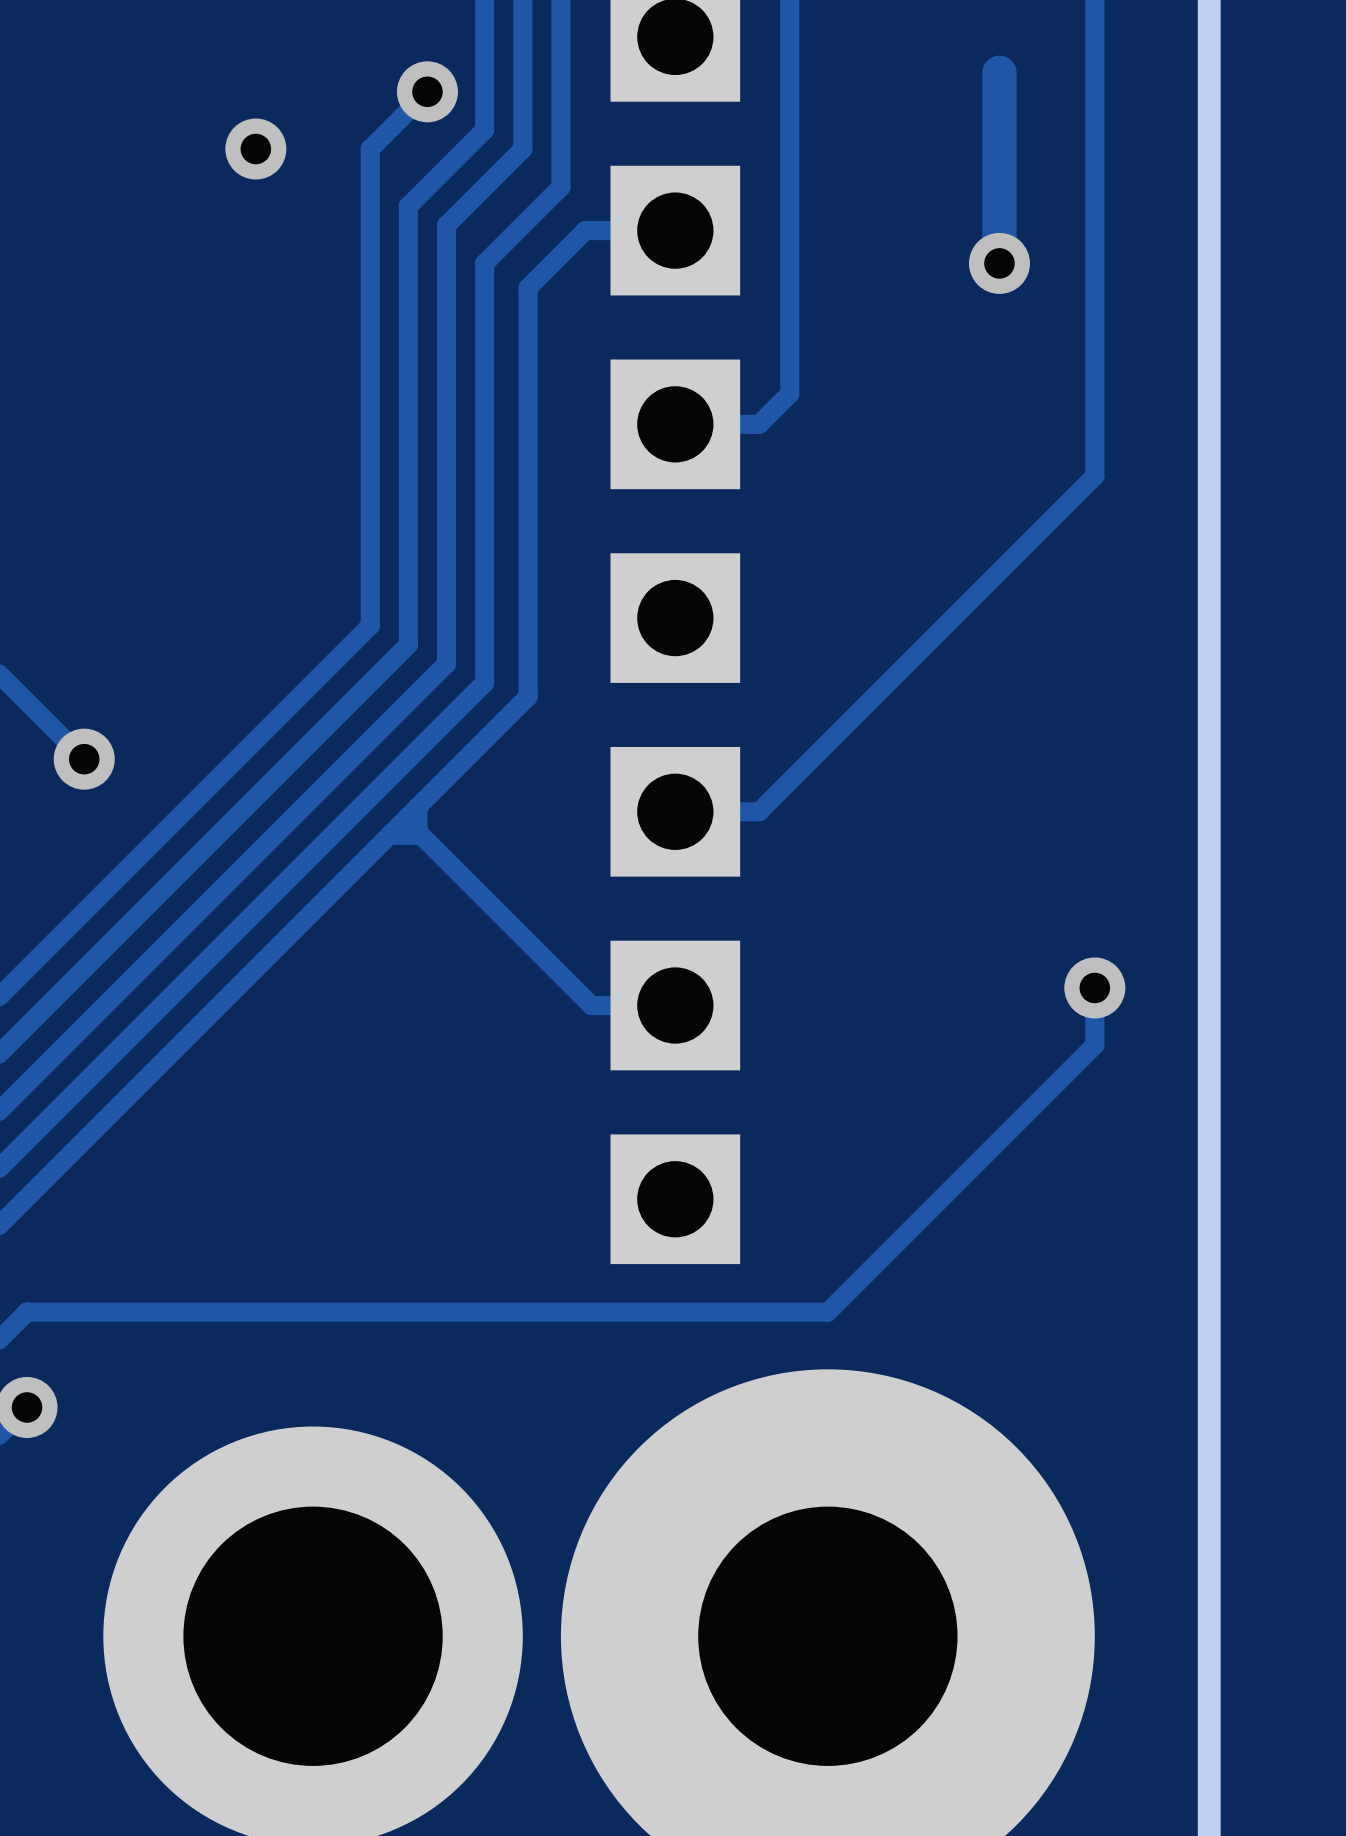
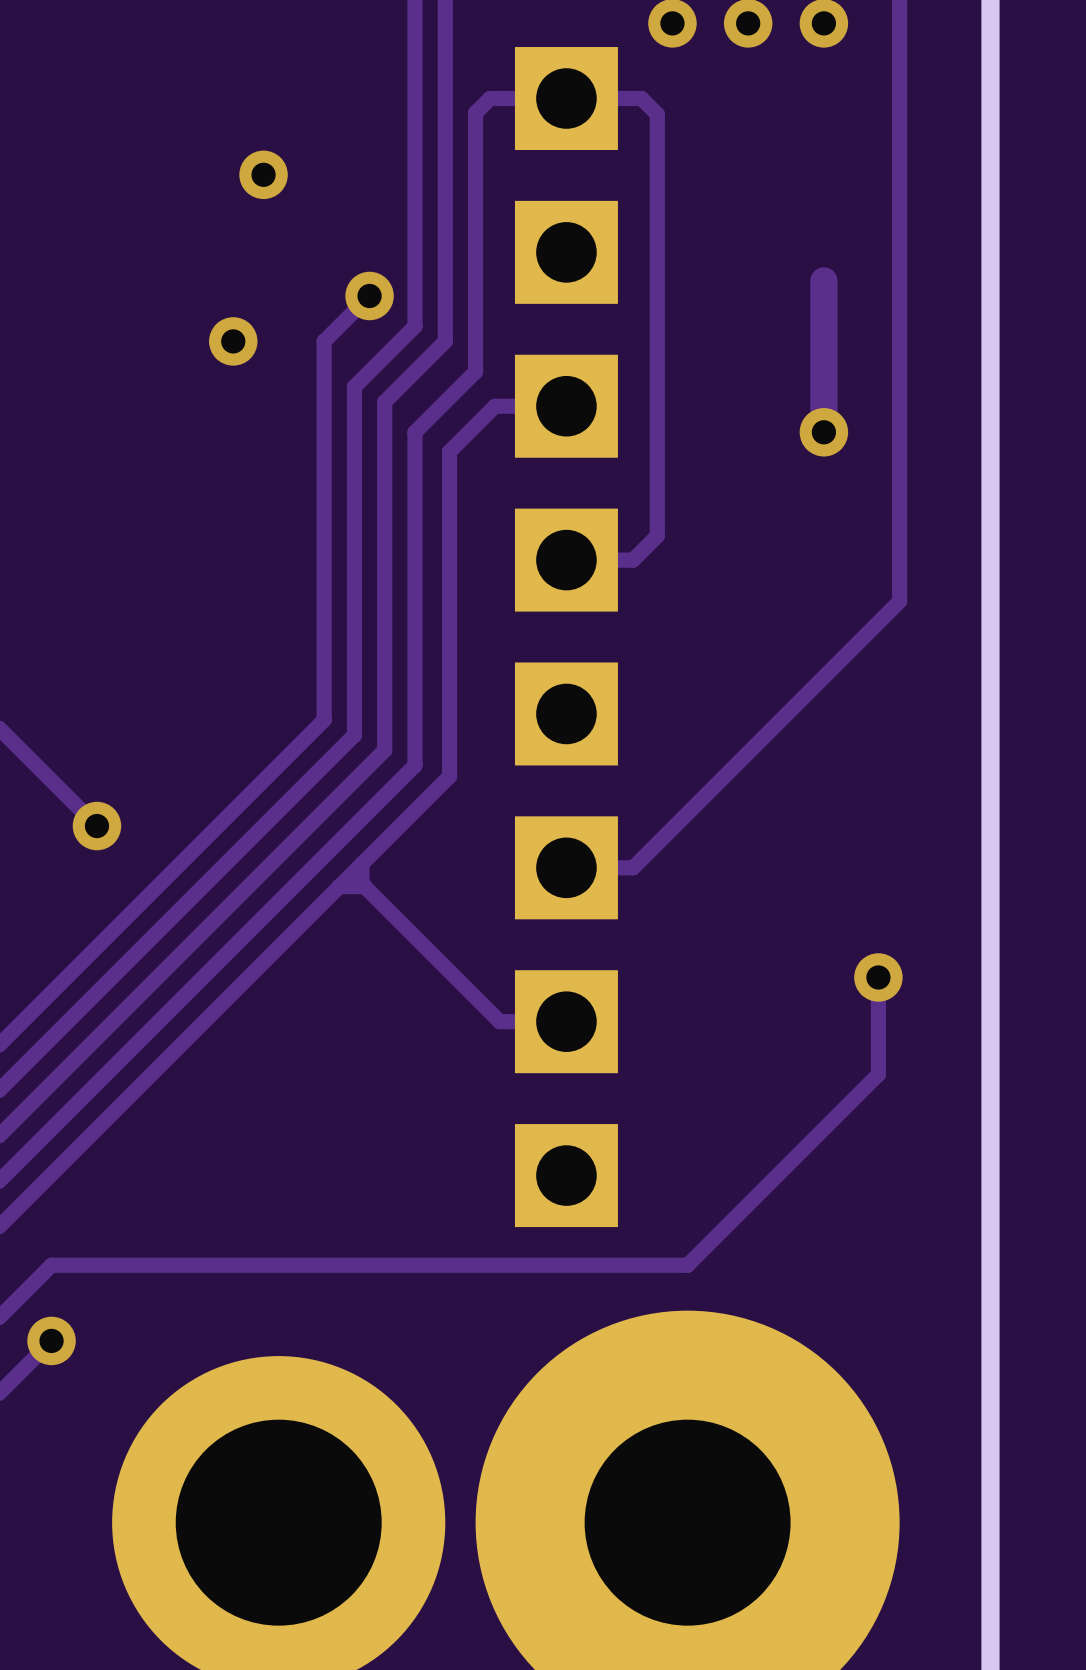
track: (1094, 987) (1094, 1045) (1068, 1071) -> (878, 977) (878, 1074)
via position: (1094, 987) -> (878, 977)

